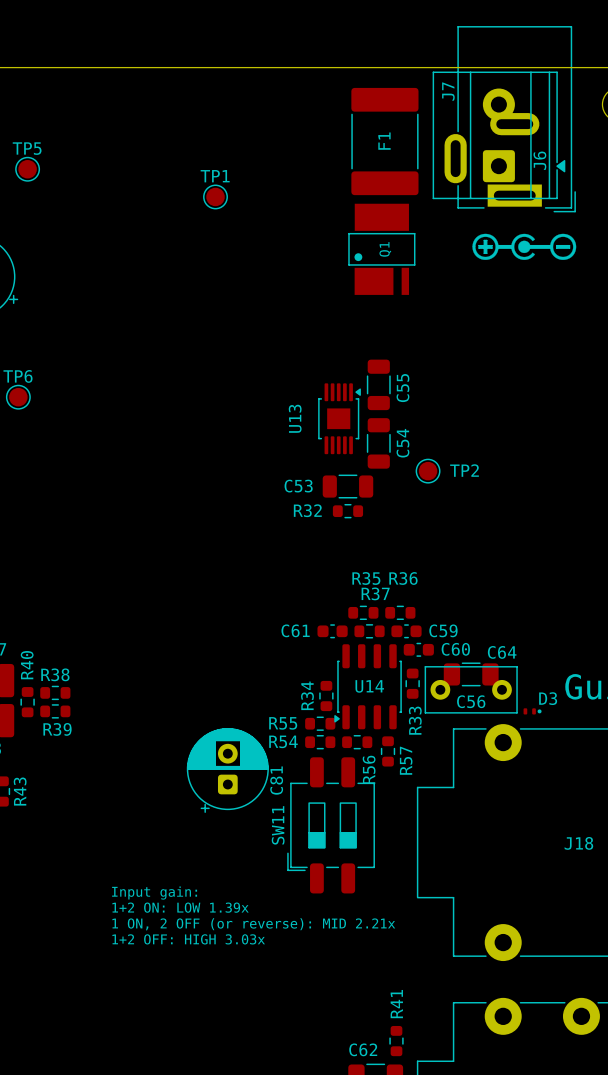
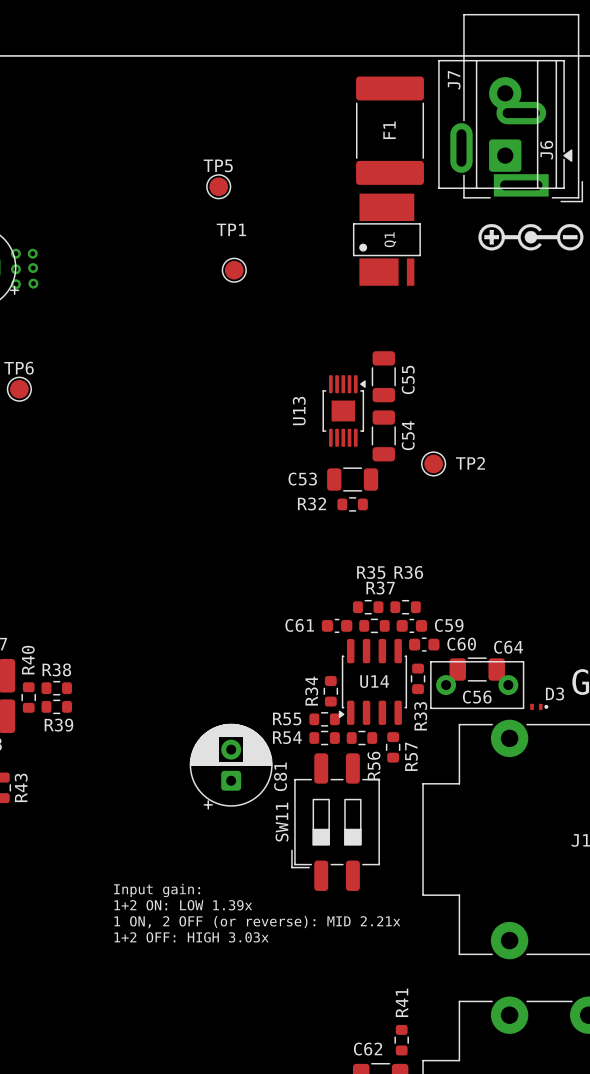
TP5: (27, 169) -> none
TP1 name: TP1 (215, 176) -> TP5 (218, 165)
via: none -> (15, 253)
via: none -> (32, 253)
via: none -> (33, 268)
via: none -> (15, 269)
TP1: none -> (234, 270)
via: none -> (33, 283)
via: none -> (15, 284)

